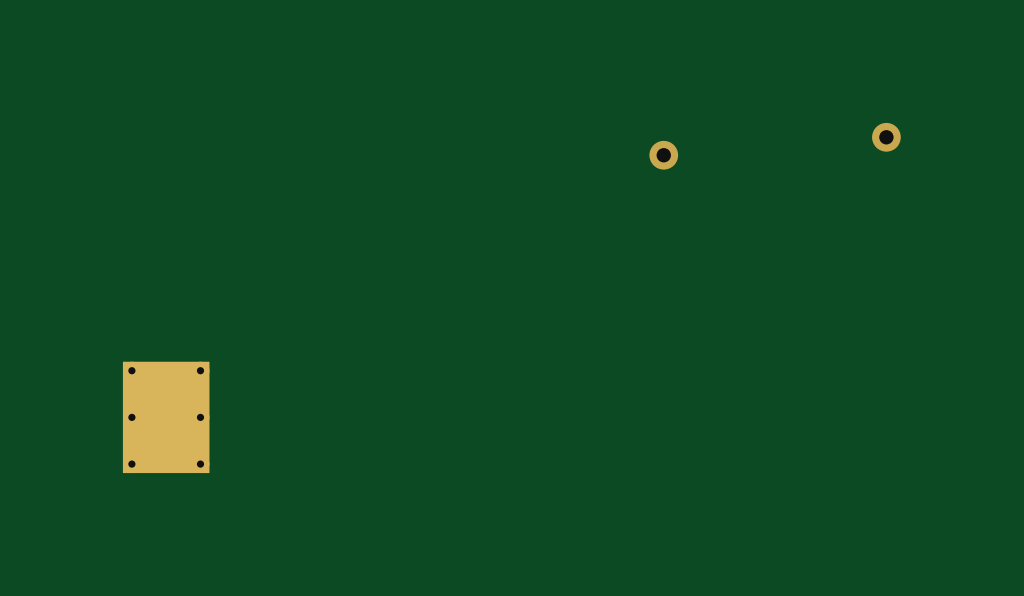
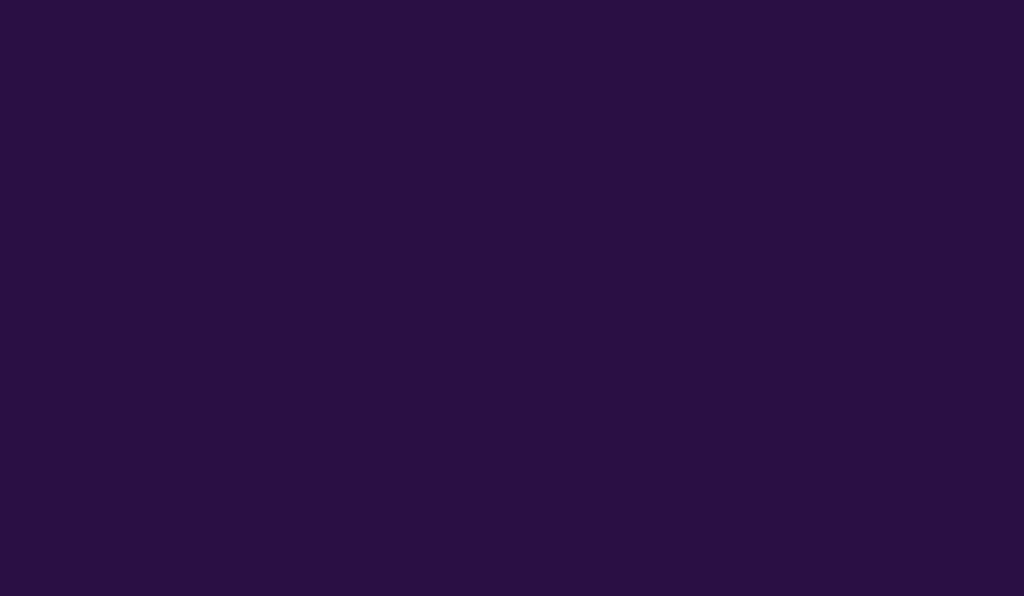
via: (886, 137) -> none
via: (663, 155) -> none
part: (166, 417) -> none

